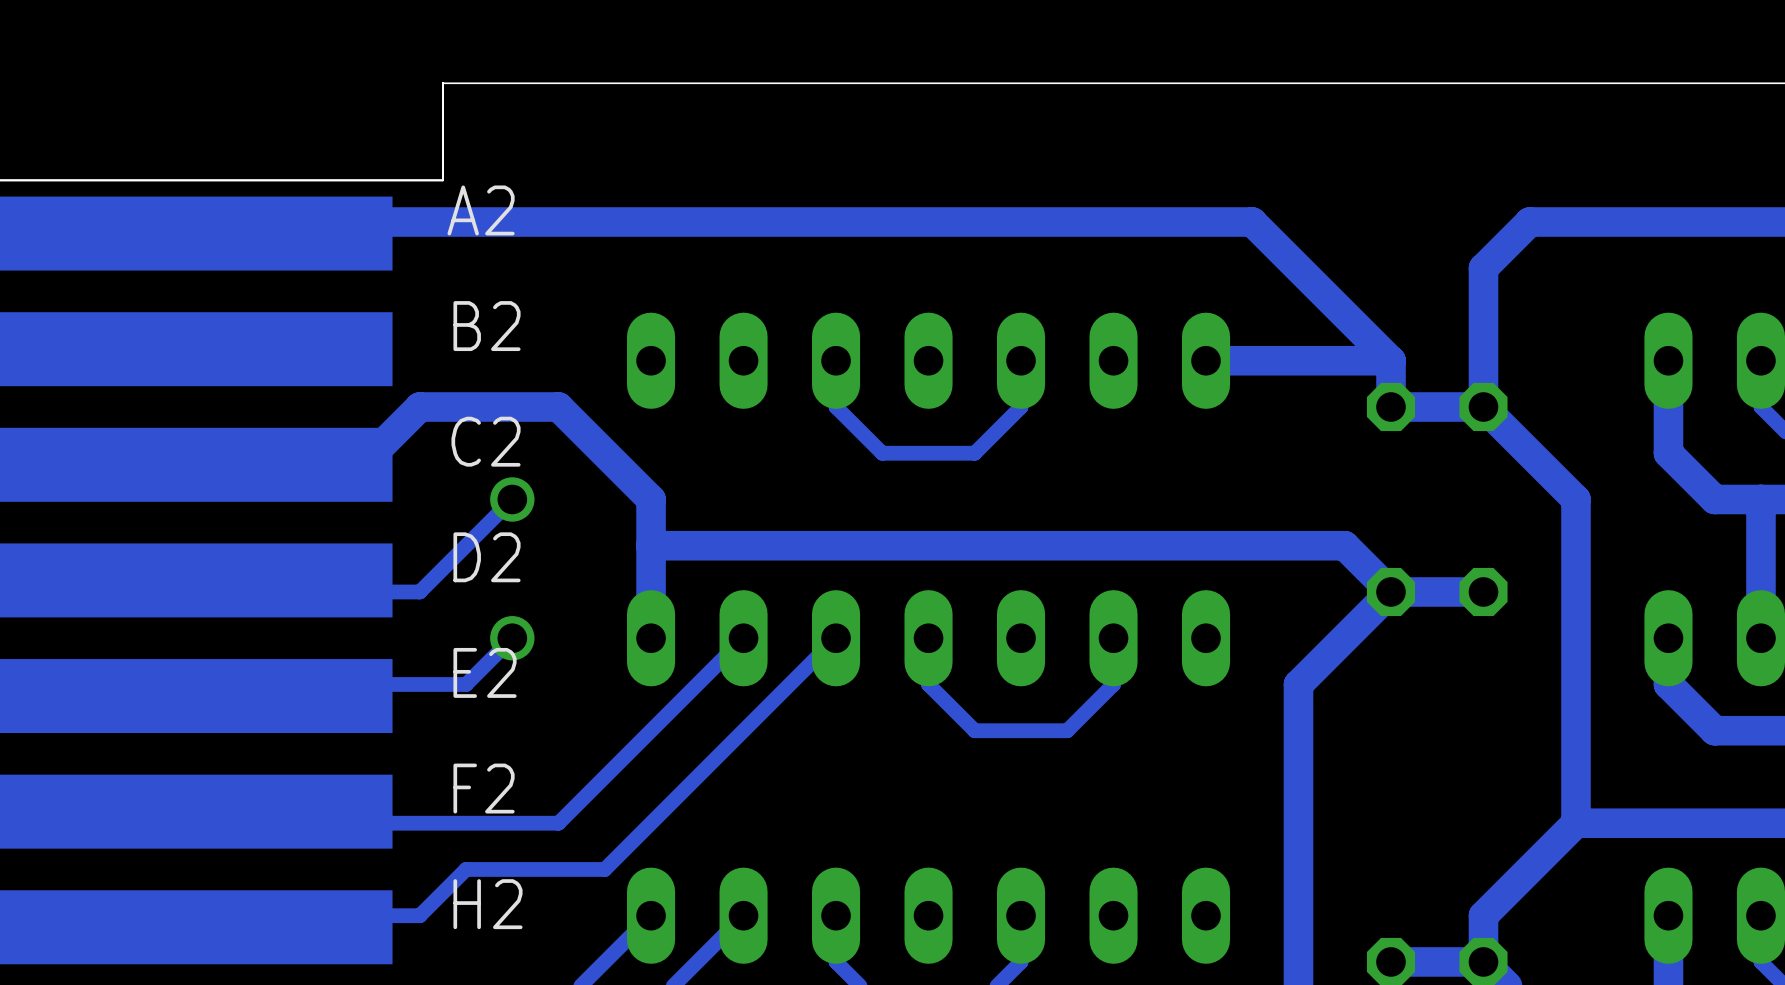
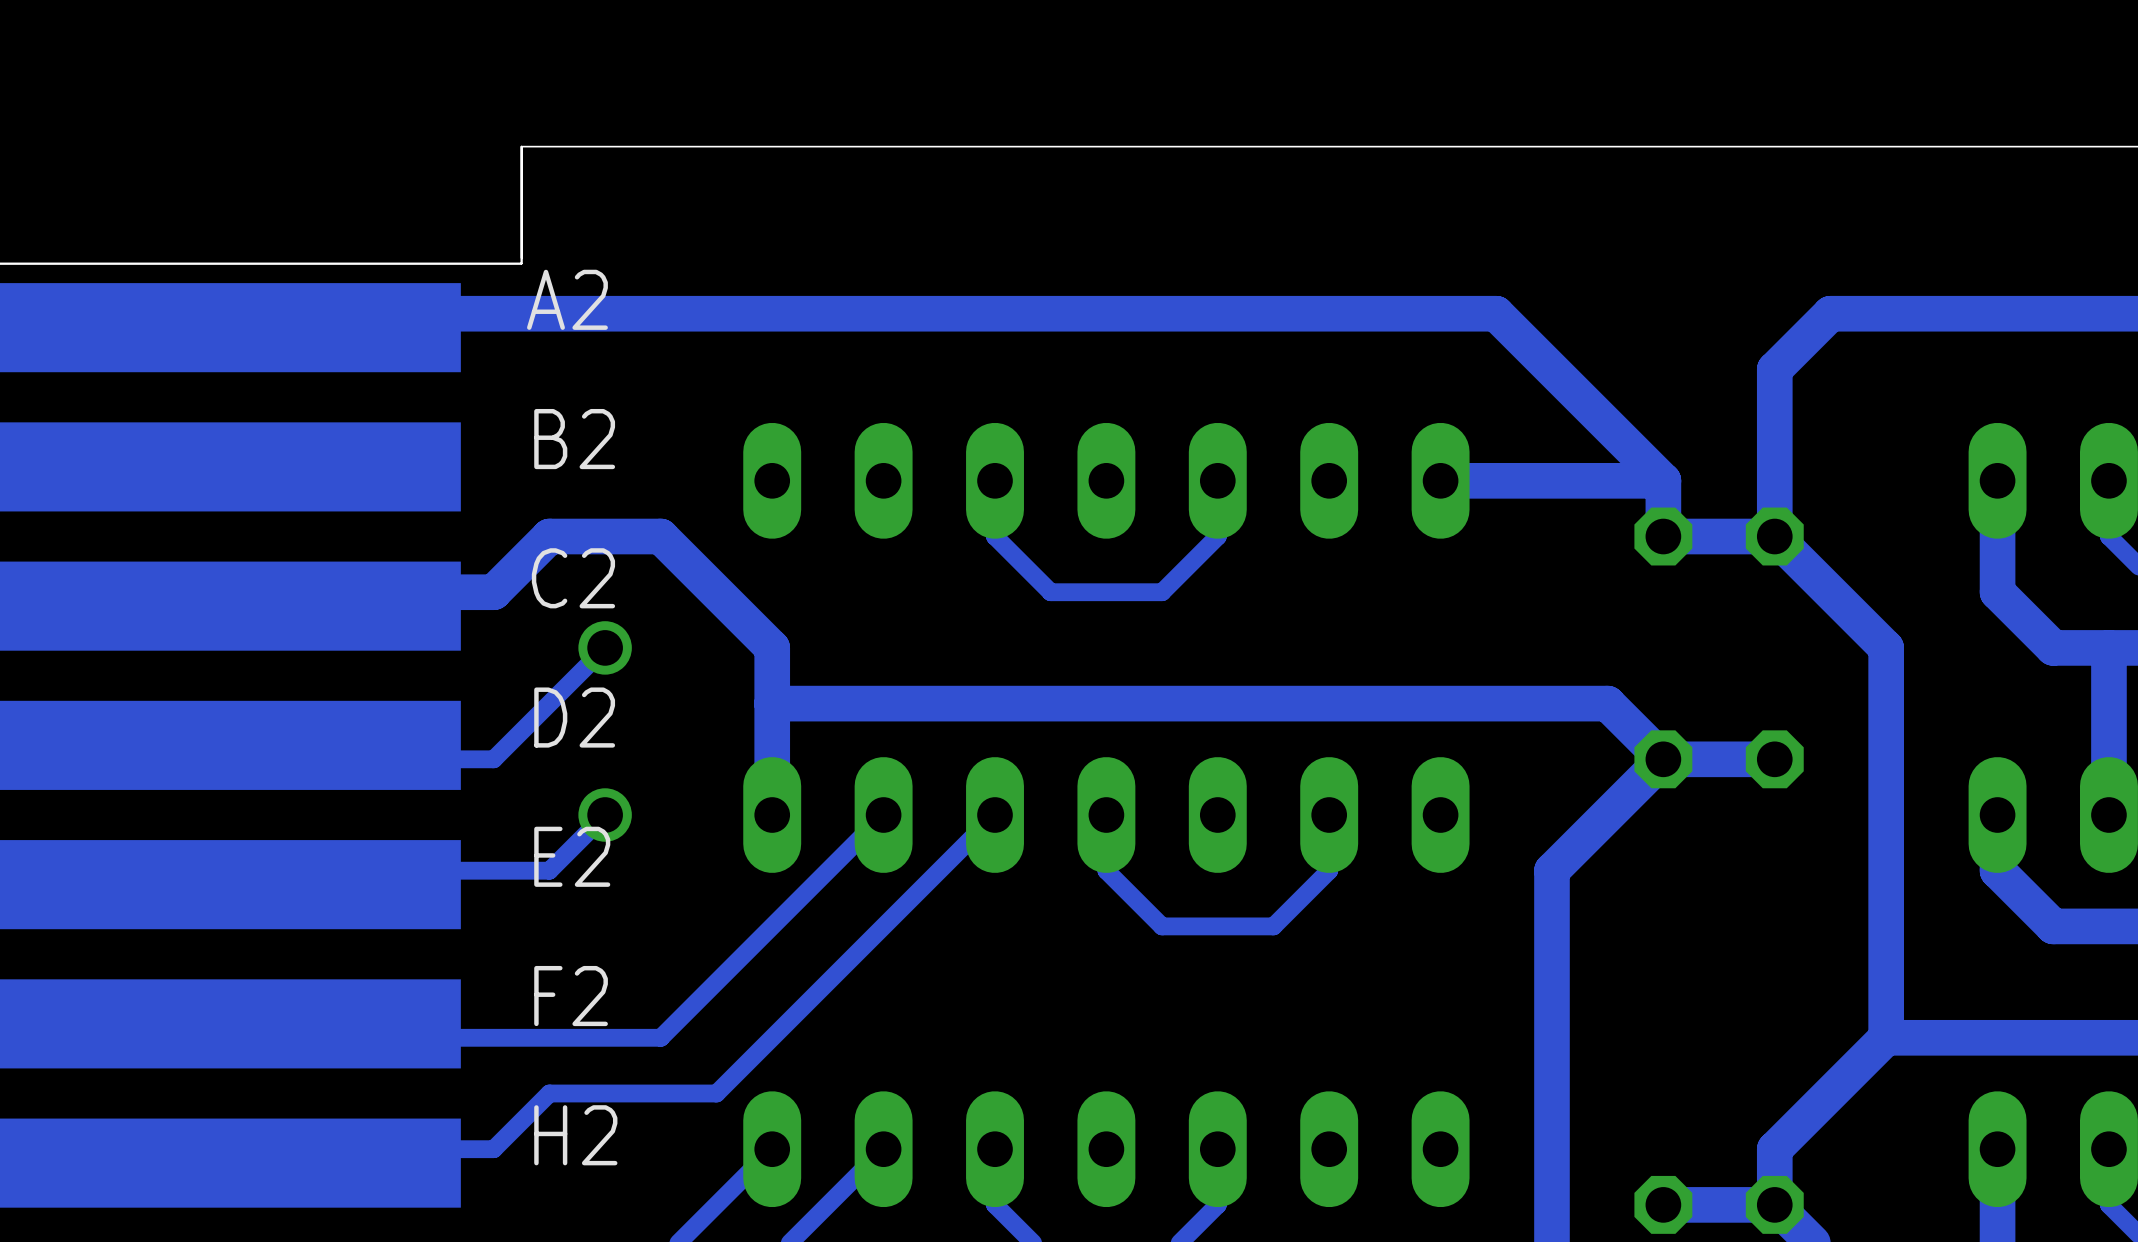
track: (466, 407) (419, 407) (373, 453) -> (549, 536) (493, 592) (438, 592)

